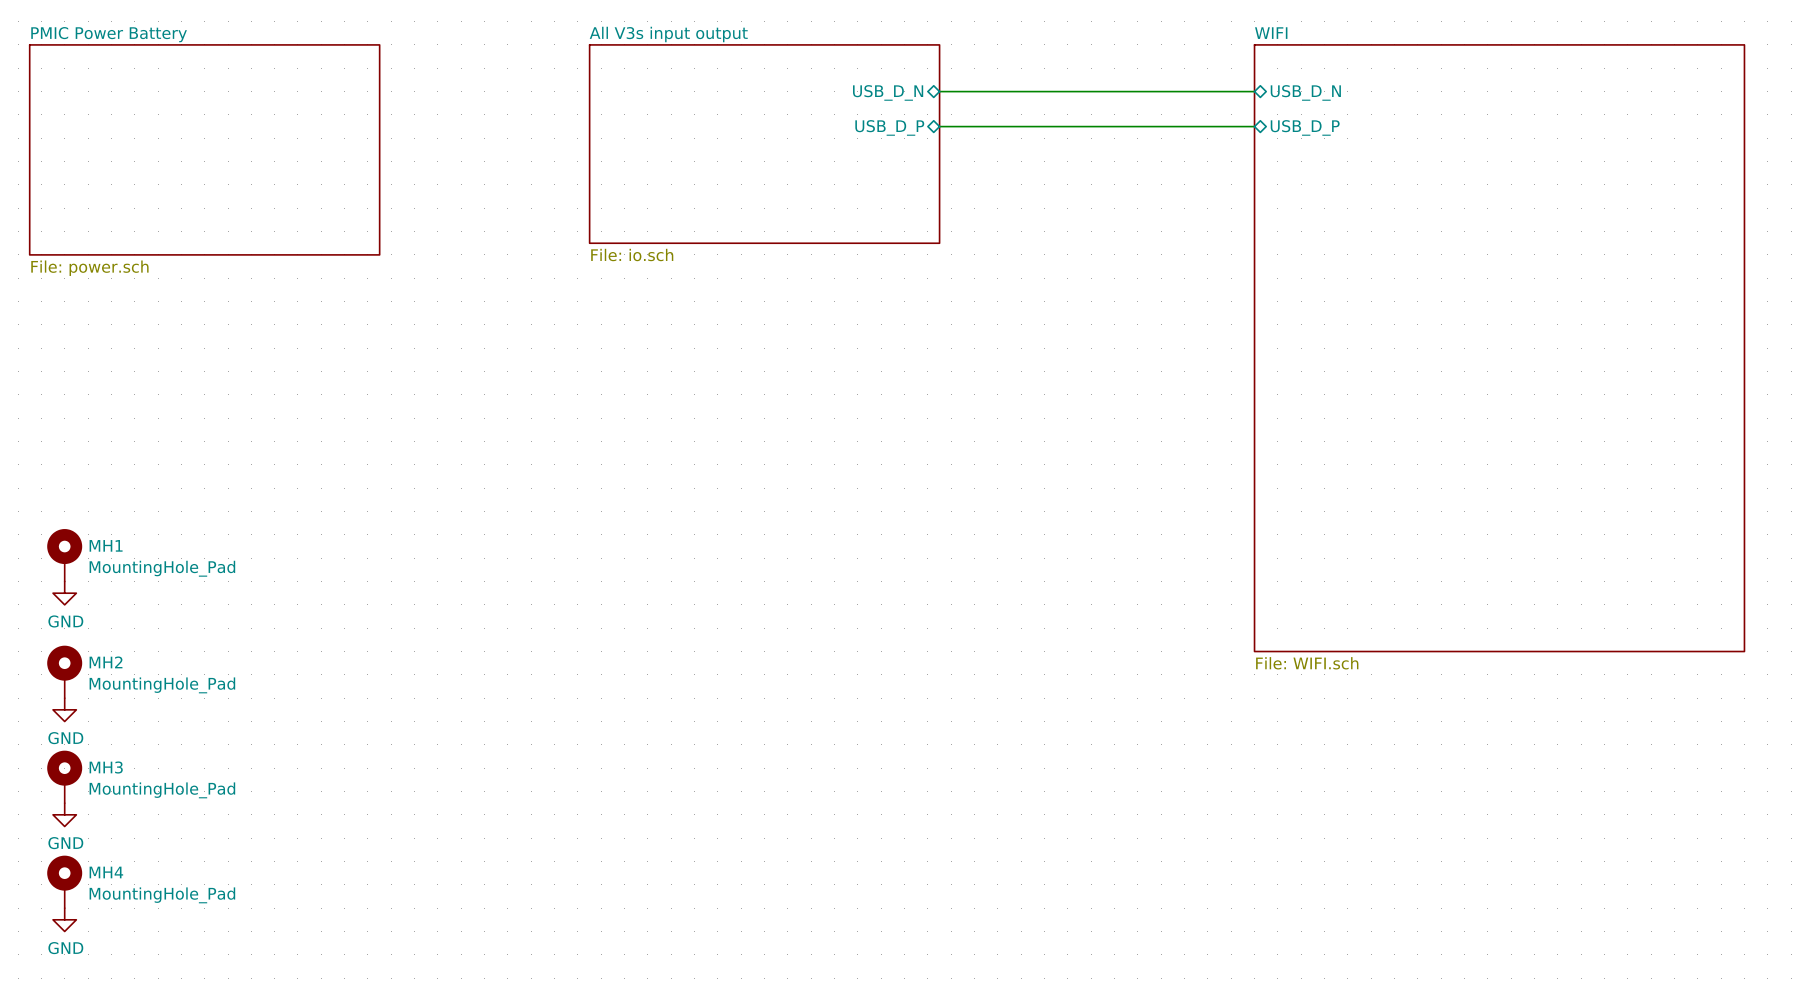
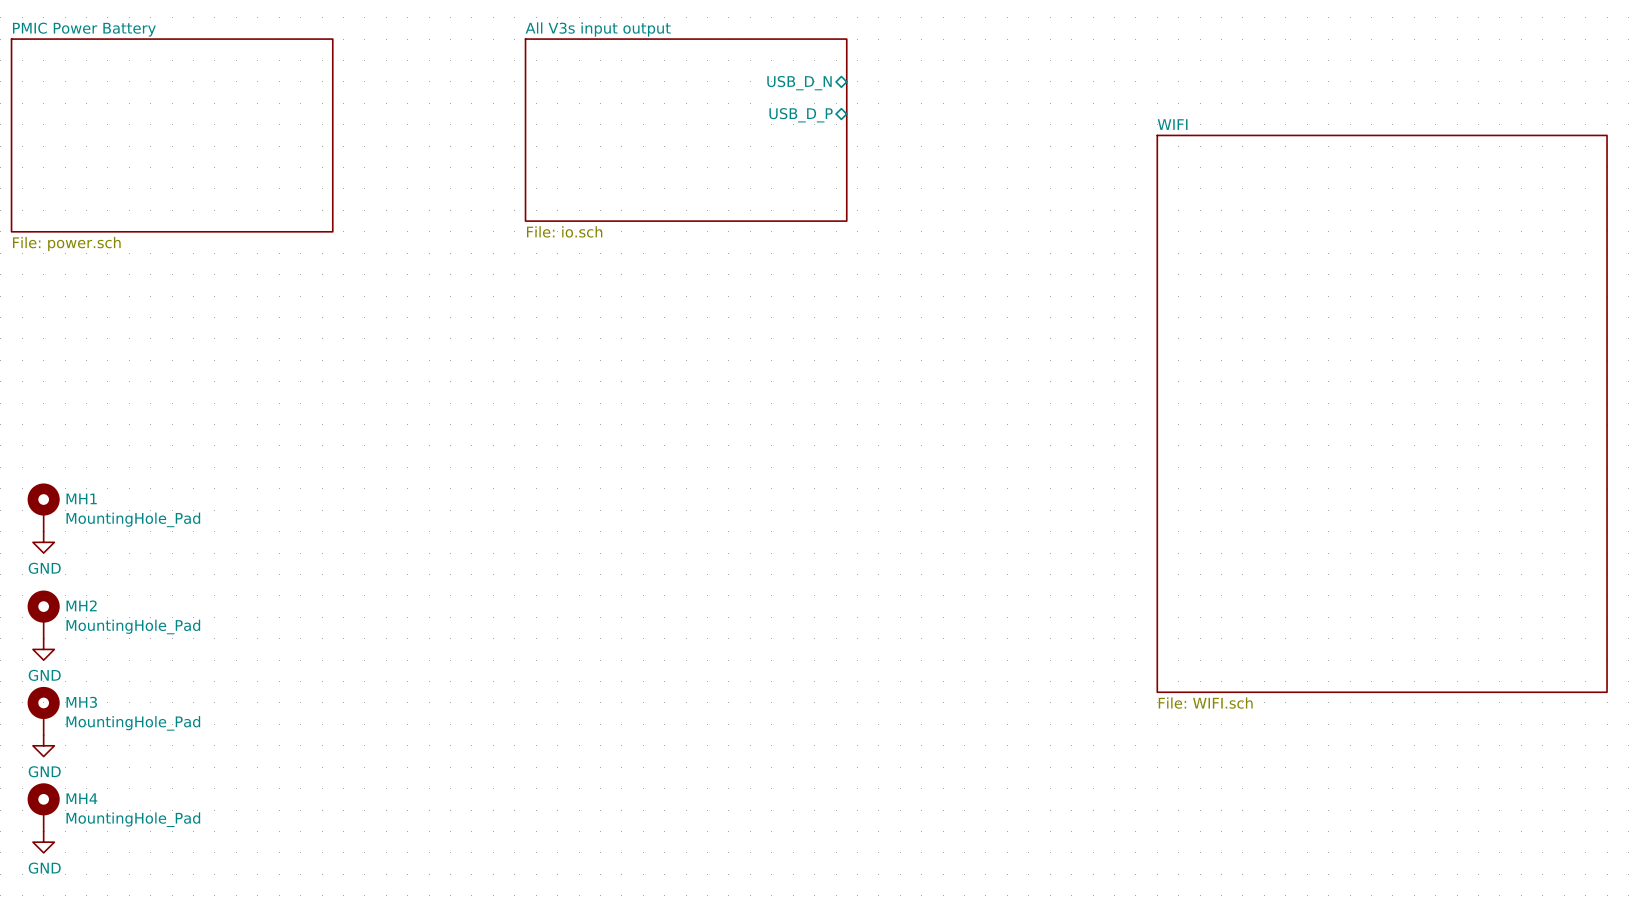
wire: (939, 91) (1254, 91) -> none
sheet pin: USB_D_N (1305, 92) -> none
wire: (939, 126) (1254, 126) -> none
sheet pin: USB_D_P (1305, 127) -> none
sheet WIFI position: (1499, 348) -> (1382, 413)

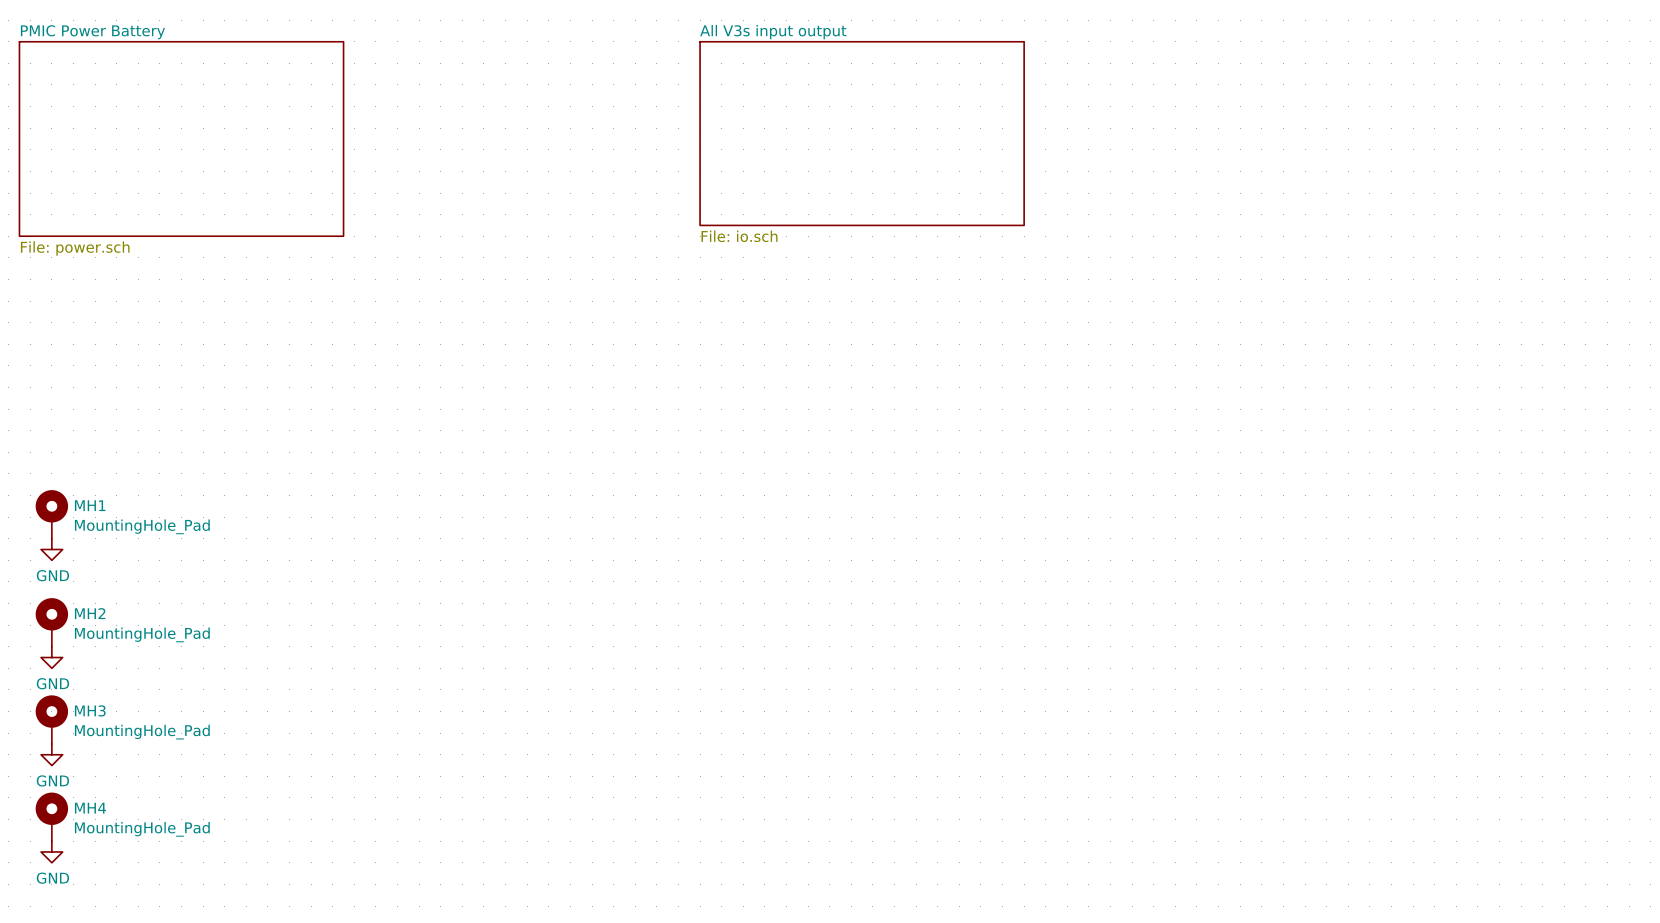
sheet pin: USB_D_N (799, 83) -> none
sheet pin: USB_D_P (801, 115) -> none
sheet All V3s input output position: (686, 130) -> (862, 133)
sheet WIFI: File: WIFI.sch (1382, 413) -> none

